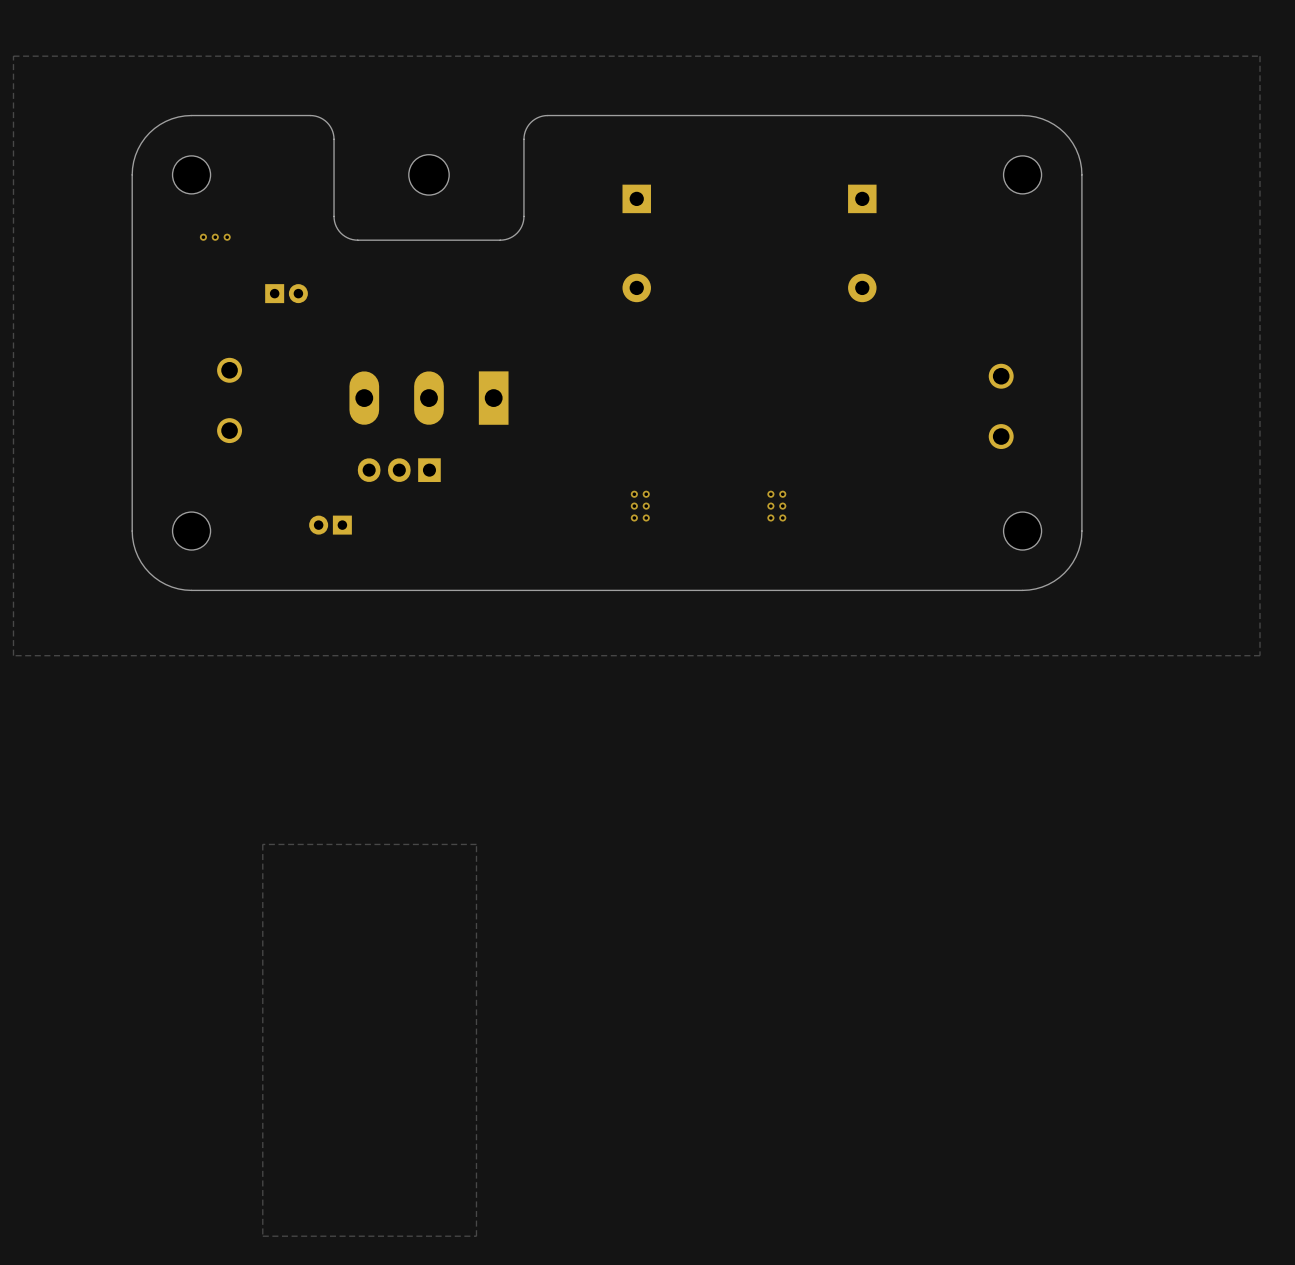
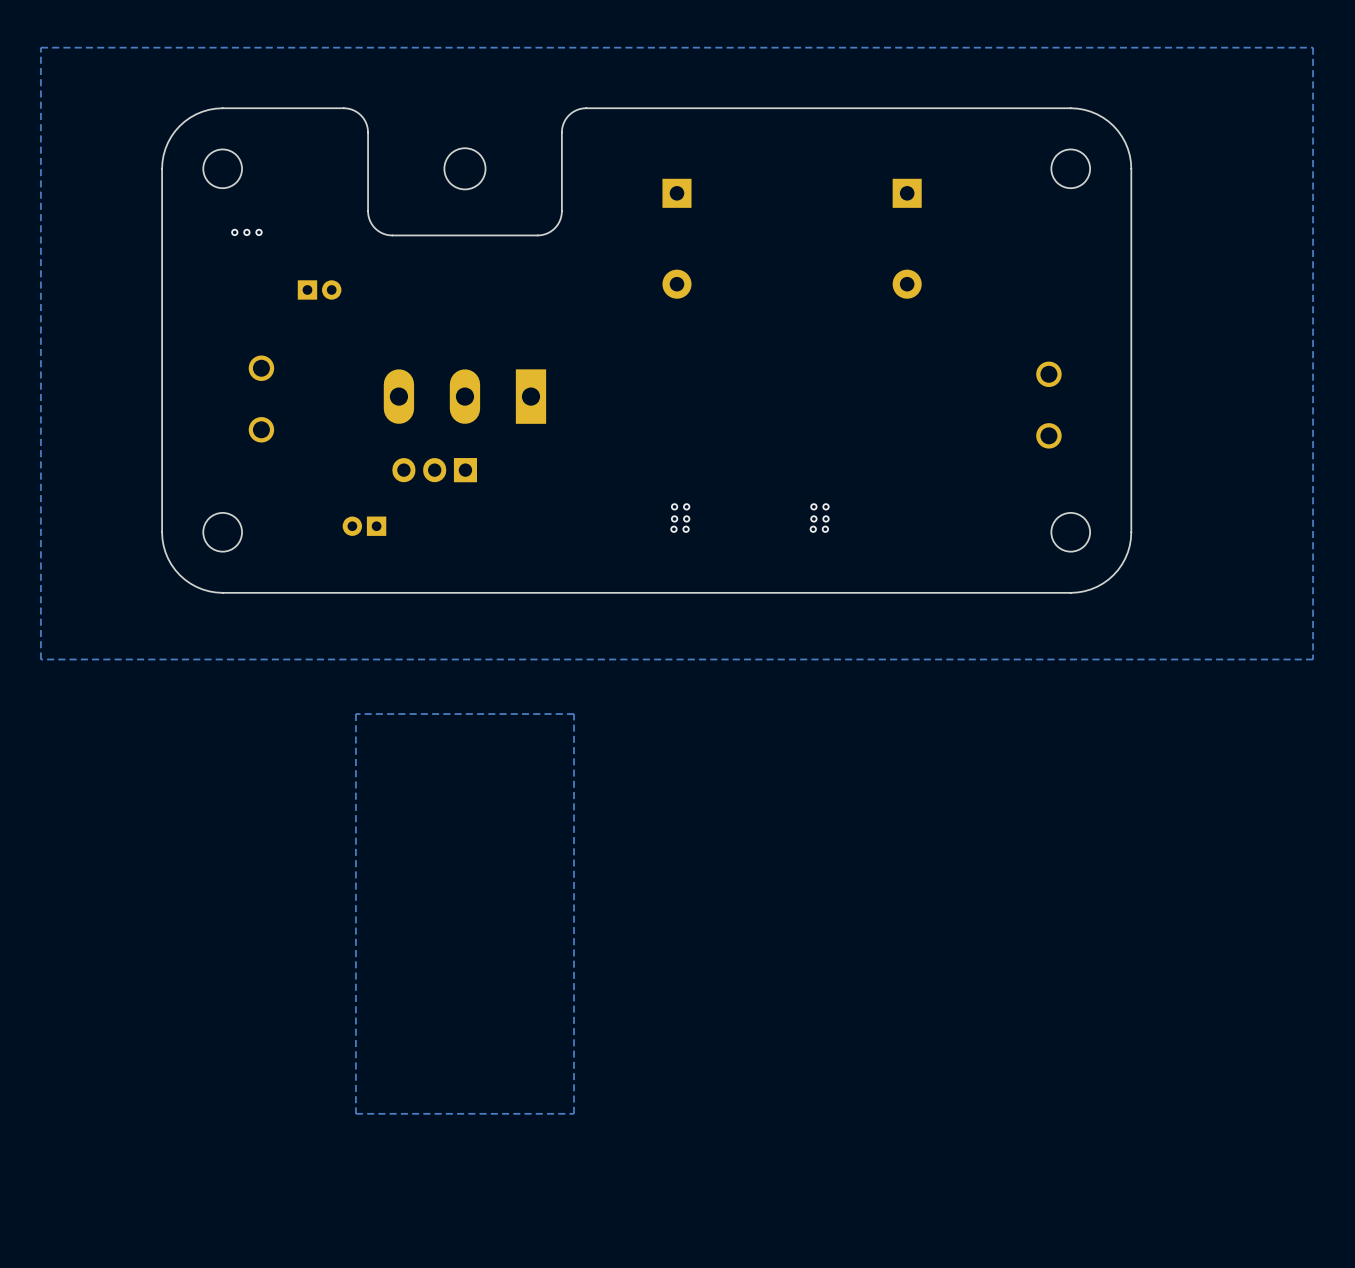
via: (634, 494) -> none
via: (646, 494) -> none
via: (770, 494) -> none
via: (782, 494) -> none
via: none -> (673, 529)
via: none -> (686, 529)
via: none -> (813, 529)
via: none -> (825, 529)
zone outline: (476, 844) (476, 1236) (262, 1236) (262, 844) (476, 844) -> (574, 714) (574, 1113) (355, 1113) (355, 714) (574, 714)

